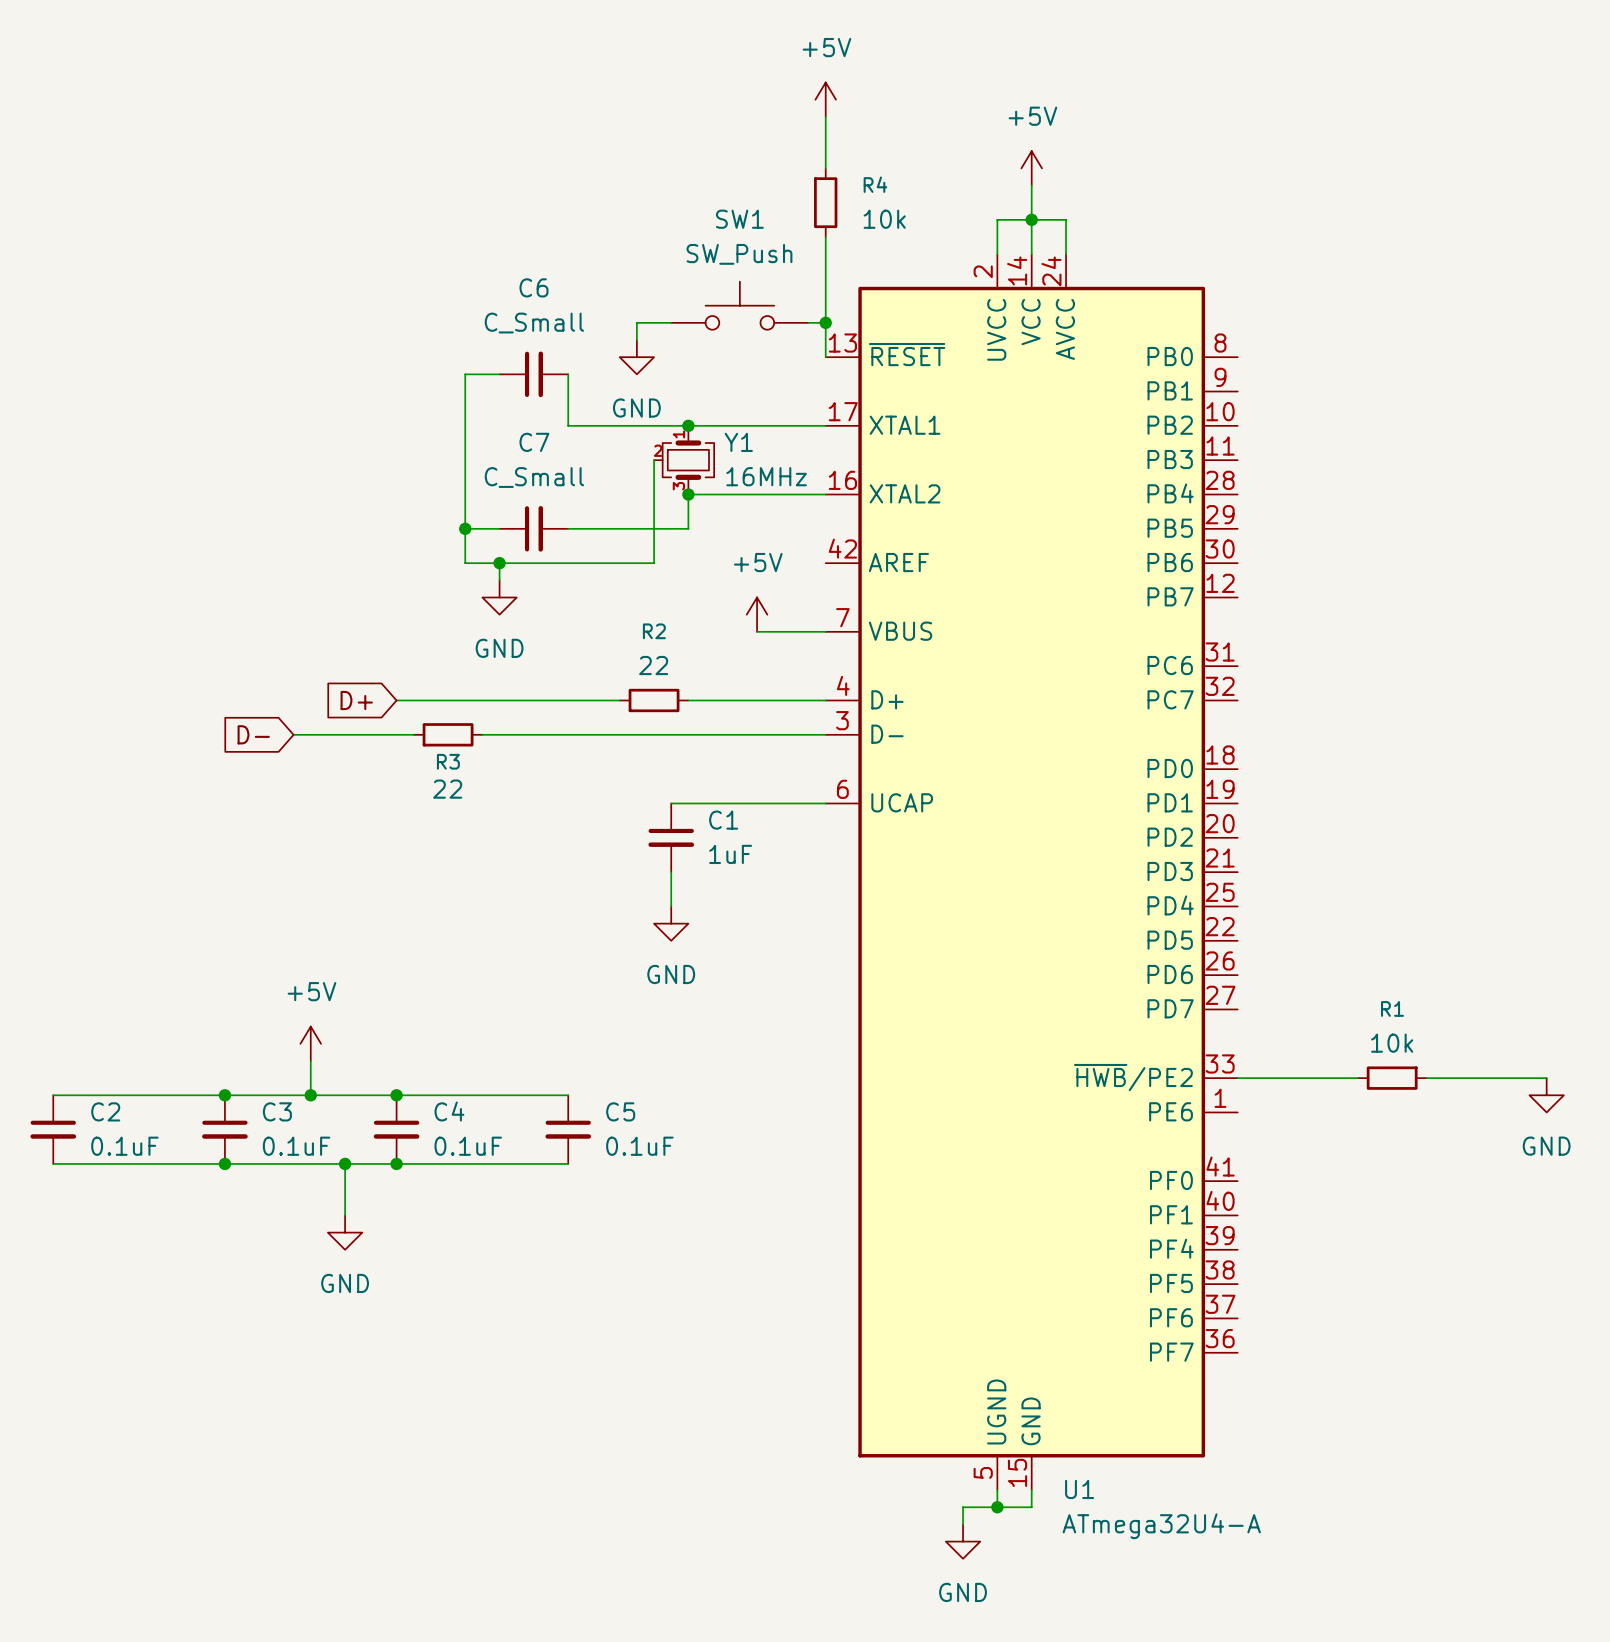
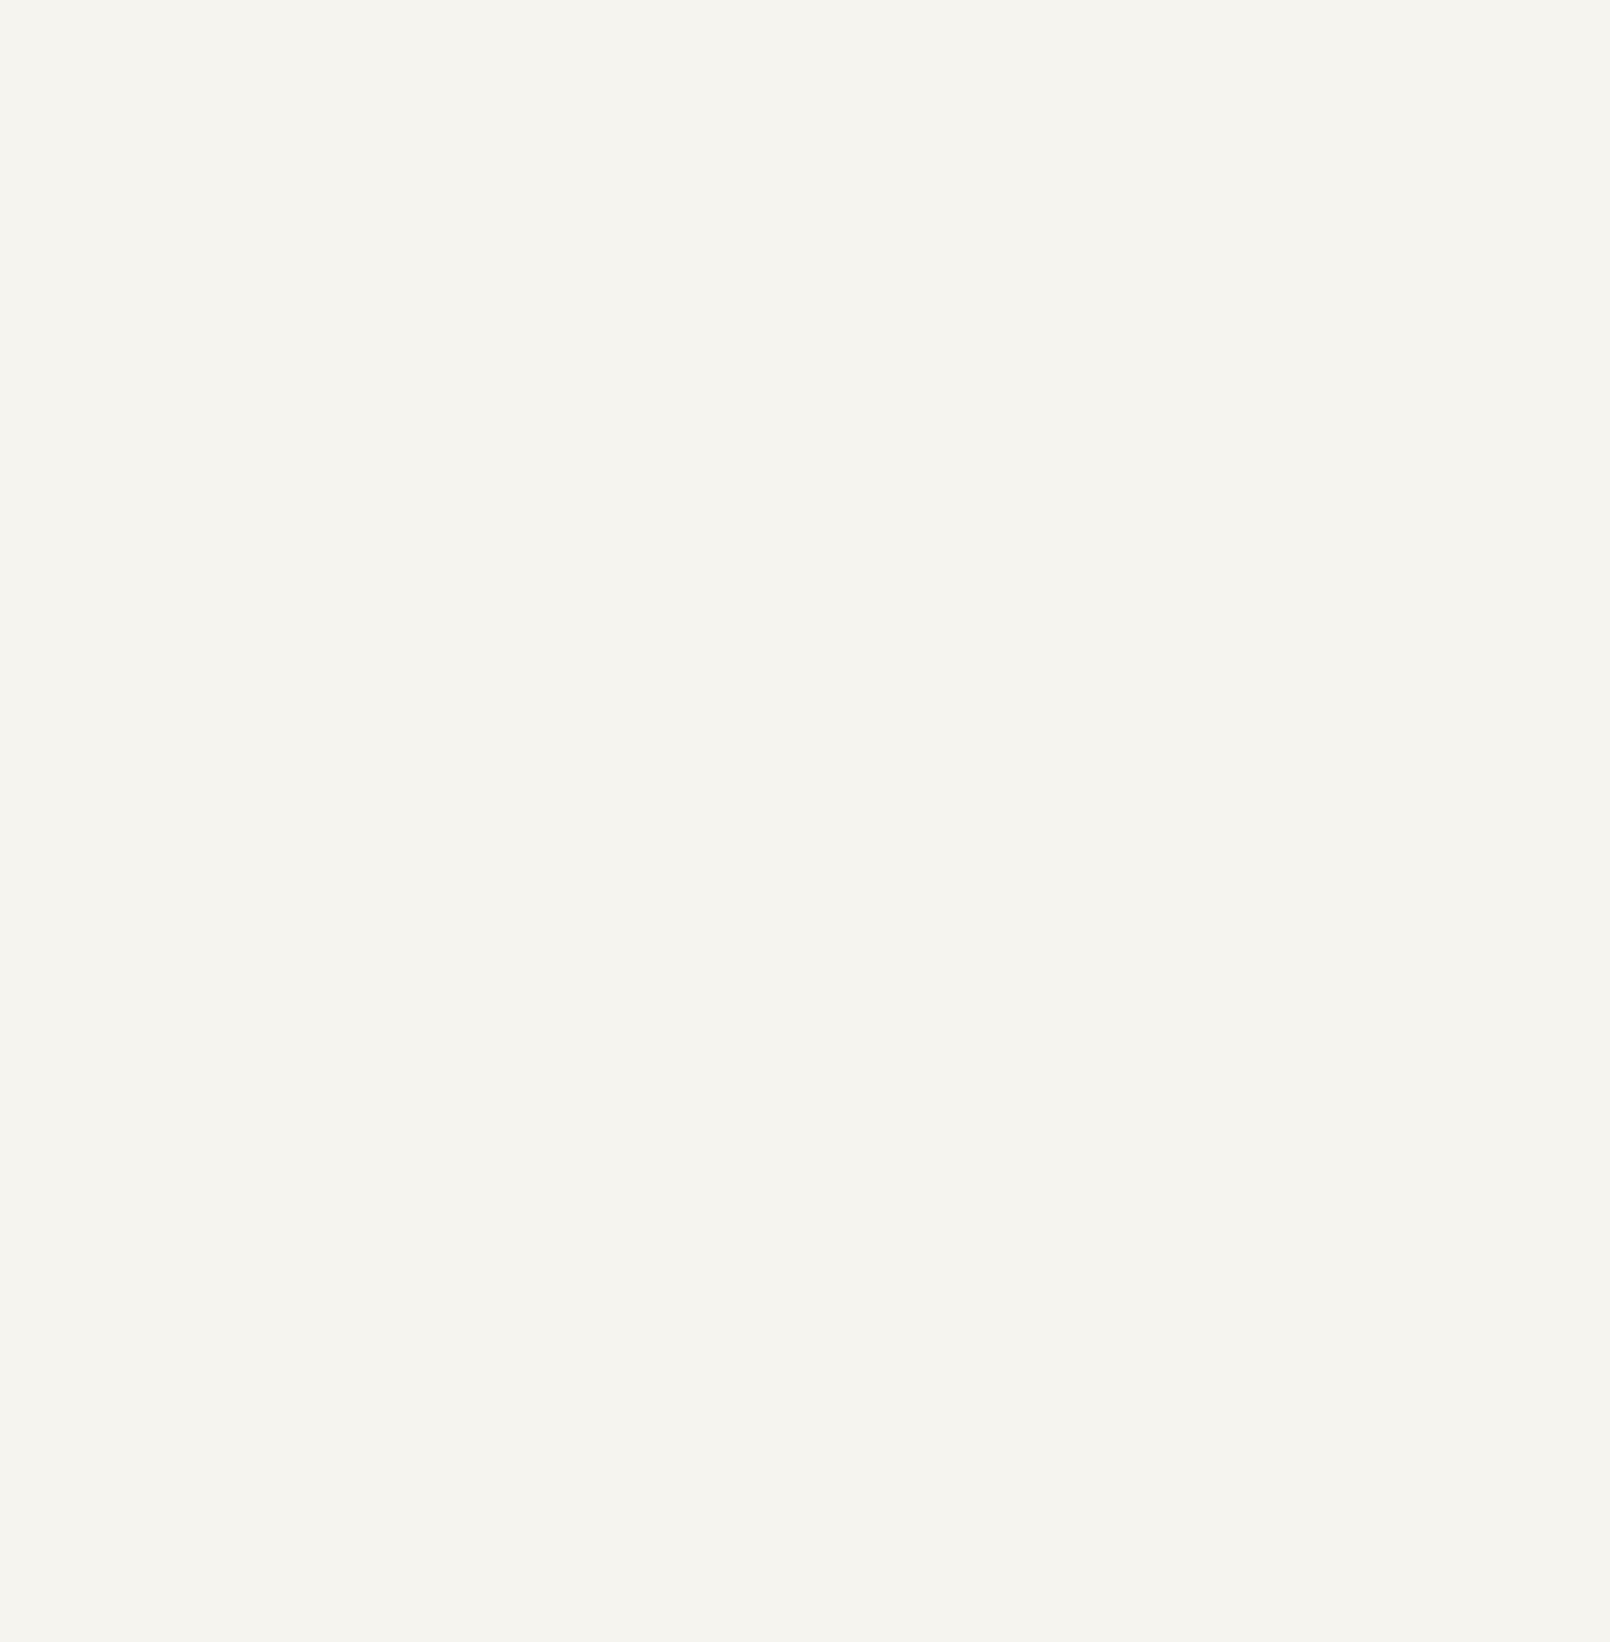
power symbol: +5V (825, 99) -> none
wire: (825, 116) (825, 168) -> none
power symbol: +5V (1031, 168) -> none
wire: (1031, 185) (1031, 254) -> none
R4: 10k (825, 202) -> none
junction: (1031, 219) -> none
wire: (825, 237) (825, 357) -> none
wire: (997, 254) (997, 219) (1066, 219) (1066, 254) -> none
SW1: SW_Push (739, 305) -> none
wire: (671, 322) (636, 322) (636, 340) -> none
wire: (808, 322) (825, 322) -> none
junction: (825, 322) -> none
power symbol: GND (636, 357) -> none
wire: (499, 374) (465, 374) (465, 563) (654, 563) (654, 460) -> none
C6: C_Small (533, 374) -> none
wire: (568, 374) (568, 425) (825, 425) -> none
junction: (688, 425) -> none
Y1: 16MHz (684, 460) -> none
junction: (688, 494) -> none
wire: (825, 494) (688, 494) (688, 528) (568, 528) -> none
wire: (465, 528) (499, 528) -> none
junction: (465, 528) -> none
C7: C_Small (533, 528) -> none
wire: (499, 563) (499, 580) -> none
junction: (499, 563) -> none
power symbol: GND (499, 597) -> none
power symbol: +5V (757, 614) -> none
wire: (757, 631) (825, 631) -> none
global label: D+ (356, 700) -> none
wire: (396, 700) (619, 700) -> none
R2: 22 (654, 700) -> none
wire: (688, 700) (825, 700) -> none
global label: D- (253, 734) -> none
wire: (293, 734) (413, 734) -> none
R3: 22 (448, 734) -> none
wire: (482, 734) (825, 734) -> none
wire: (671, 803) (825, 803) -> none
C1: 1uF (671, 837) -> none
wire: (671, 872) (671, 906) -> none
U1: ATmega32U4-A (1031, 872) -> none
power symbol: GND (671, 923) -> none
power symbol: +5V (310, 1043) -> none
wire: (310, 1060) (310, 1095) -> none
wire: (1237, 1078) (1357, 1078) -> none
R1: 10k (1392, 1078) -> none
wire: (1426, 1078) (1546, 1078) -> none
wire: (53, 1095) (568, 1095) -> none
junction: (224, 1095) -> none
junction: (310, 1095) -> none
junction: (396, 1095) -> none
power symbol: GND (1546, 1095) -> none
C2: 0.1uF (53, 1129) -> none
C3: 0.1uF (224, 1129) -> none
C4: 0.1uF (396, 1129) -> none
C5: 0.1uF (568, 1129) -> none
wire: (53, 1163) (568, 1163) -> none
junction: (224, 1163) -> none
wire: (345, 1163) (345, 1215) -> none
junction: (345, 1163) -> none
junction: (396, 1163) -> none
power symbol: GND (345, 1232) -> none
wire: (997, 1490) (997, 1507) -> none
wire: (1031, 1490) (1031, 1507) (963, 1507) (963, 1524) -> none
junction: (997, 1507) -> none
power symbol: GND (963, 1541) -> none

